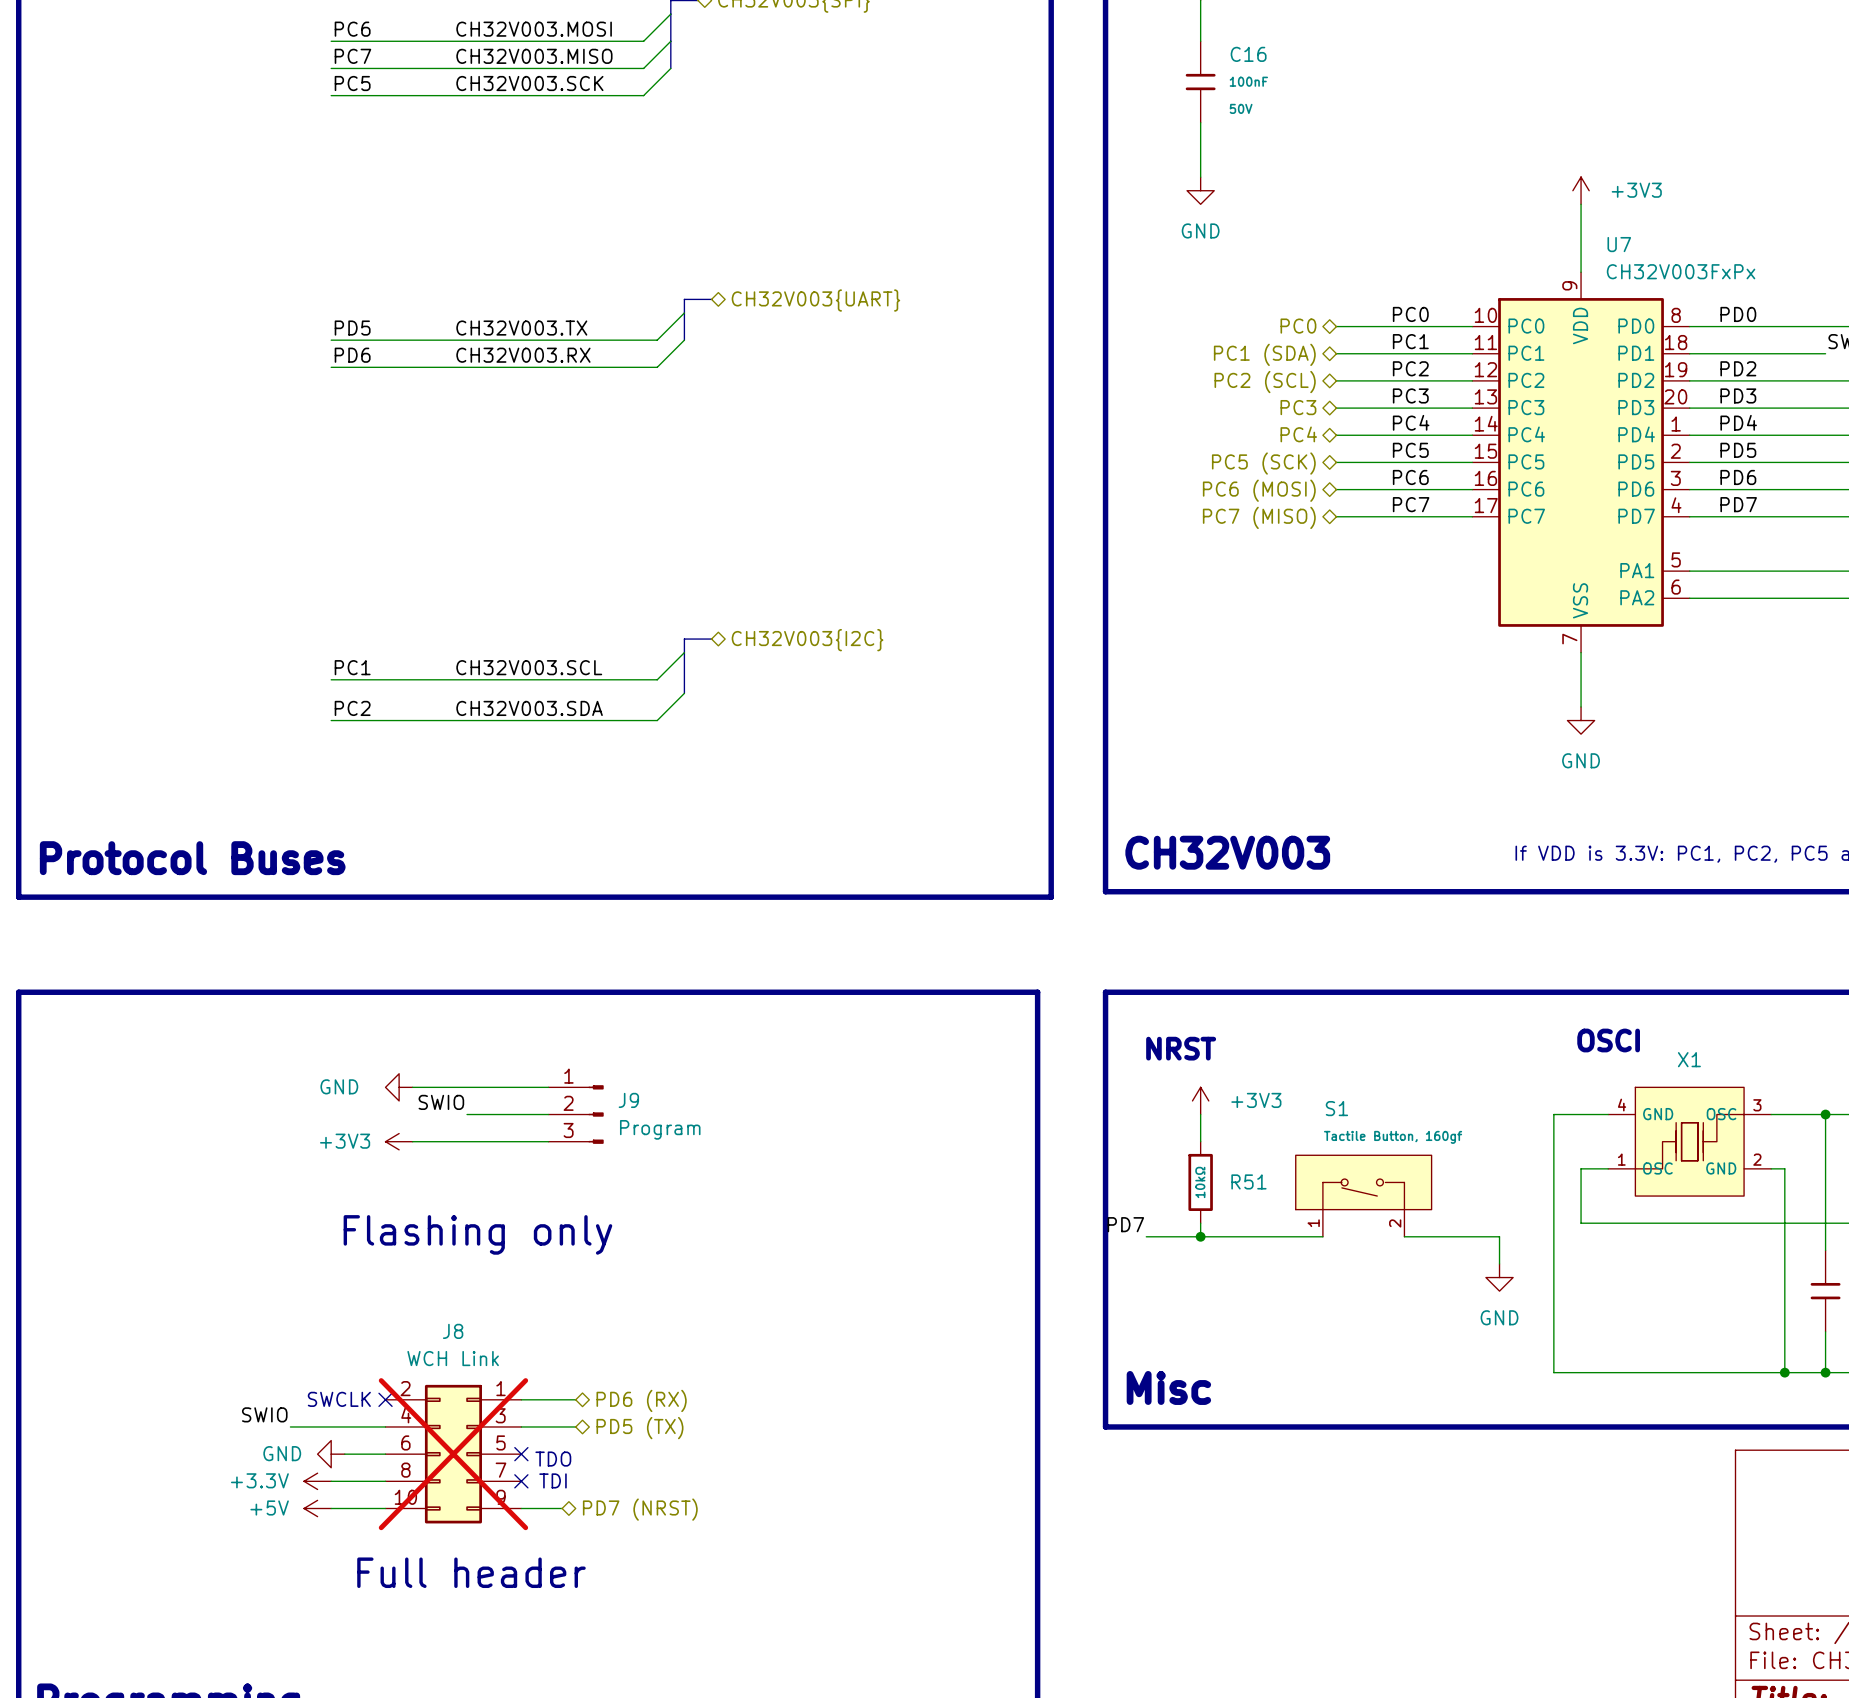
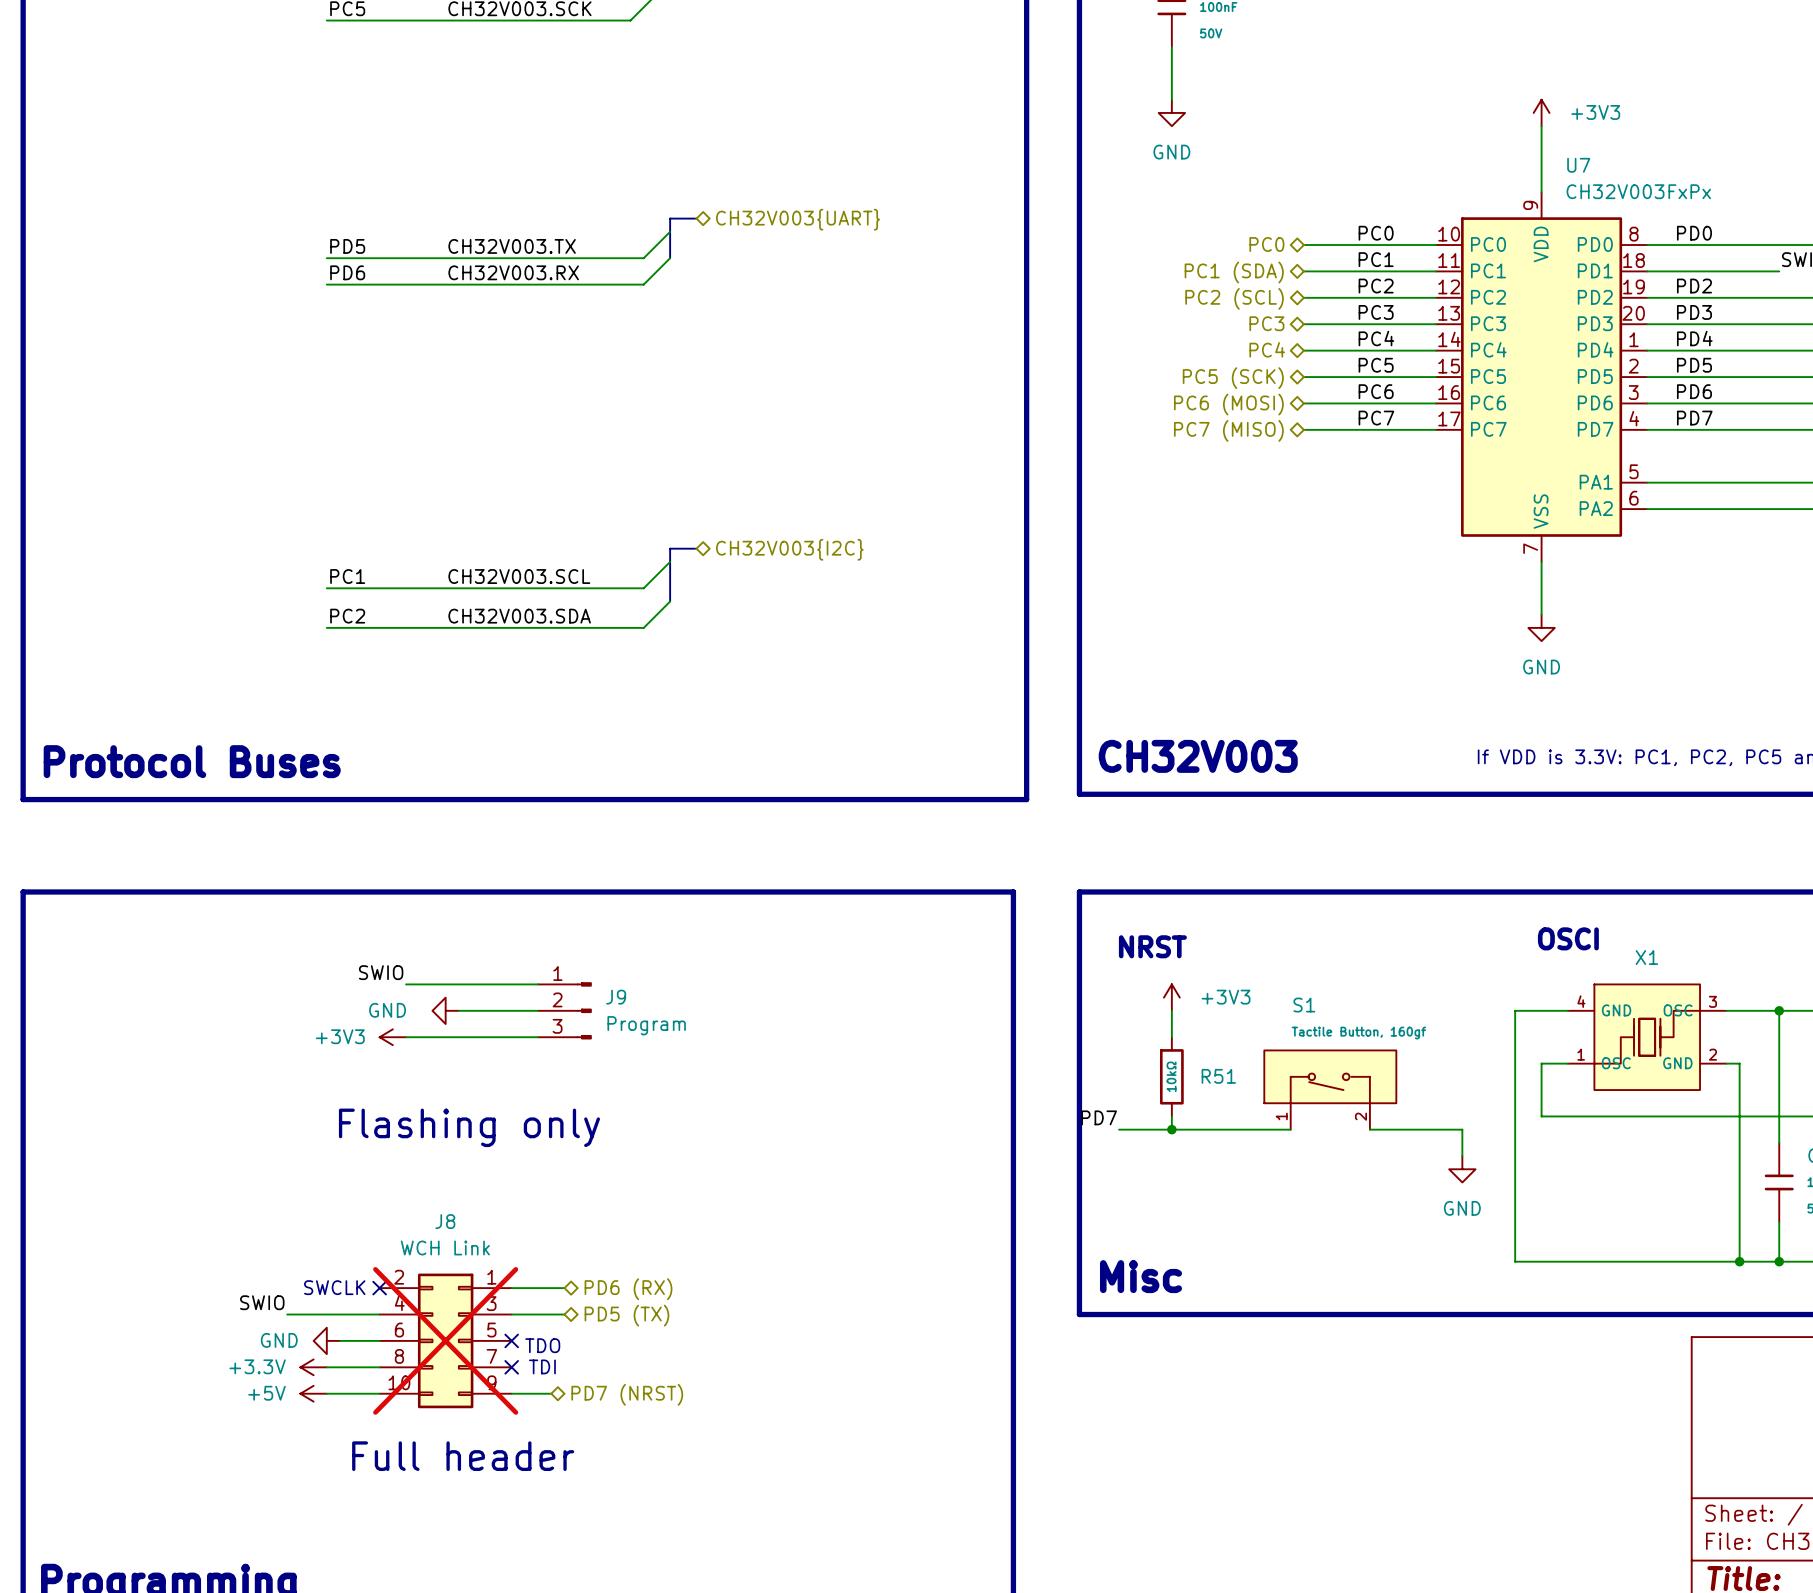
power symbol position: GND (399, 1087) -> GND (445, 1010)
label position: SWIO (441, 1102) -> SWIO (381, 972)

